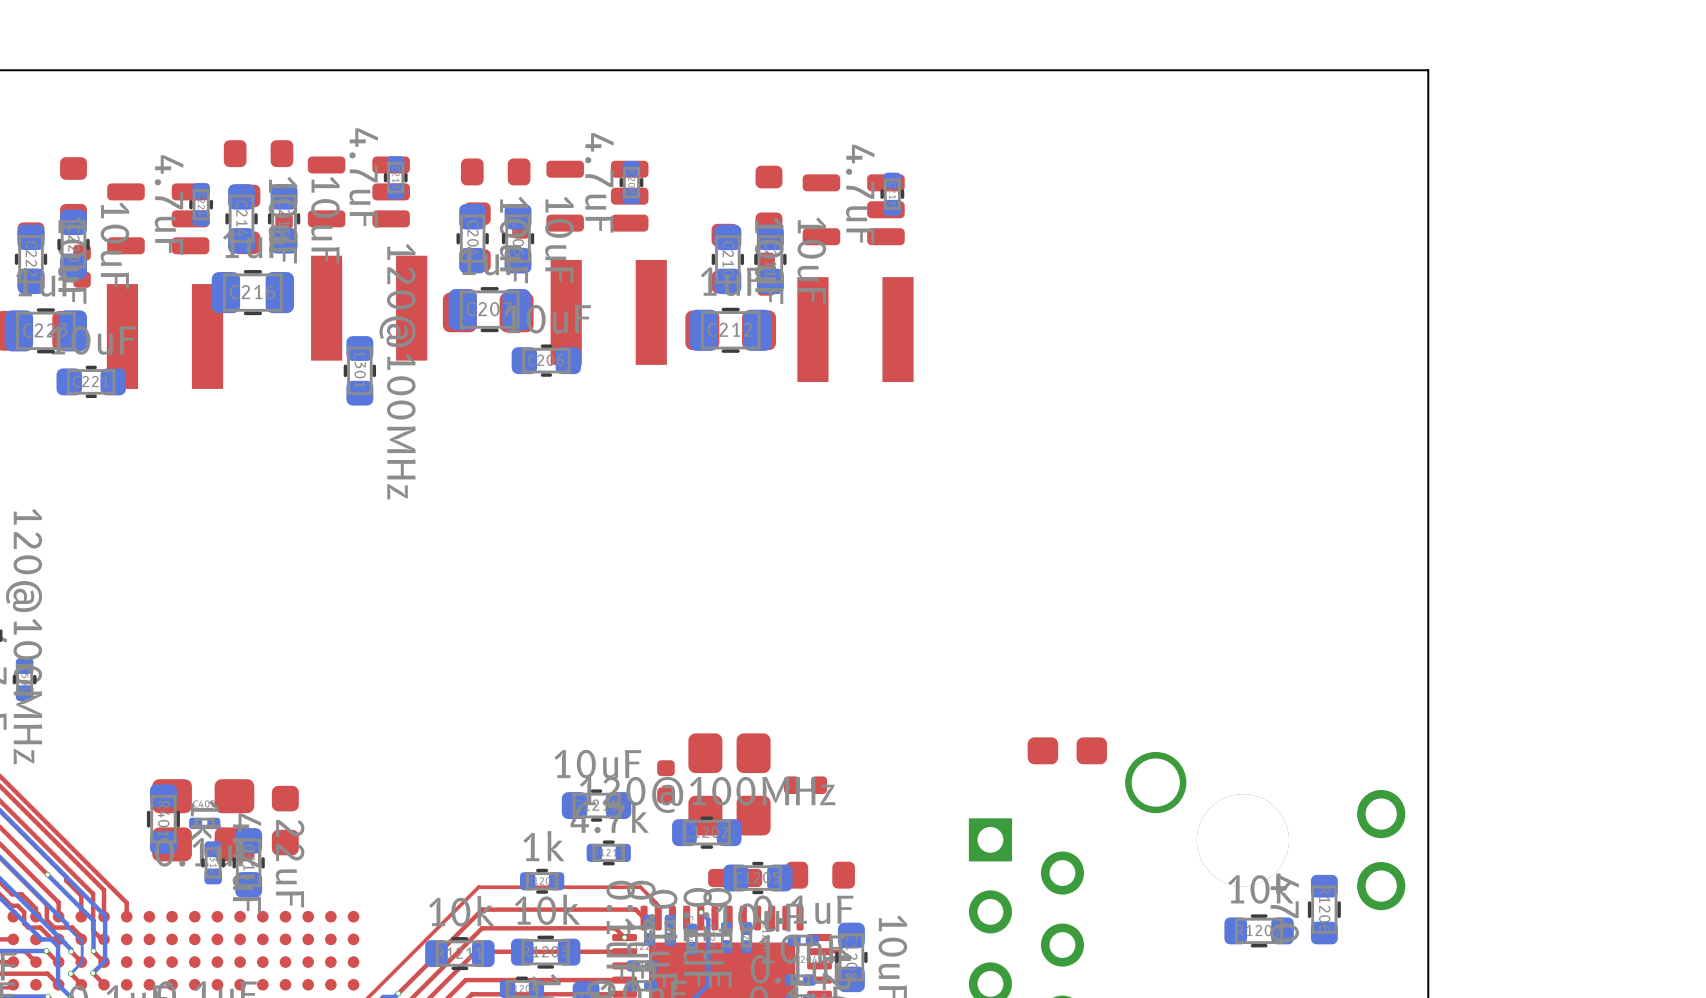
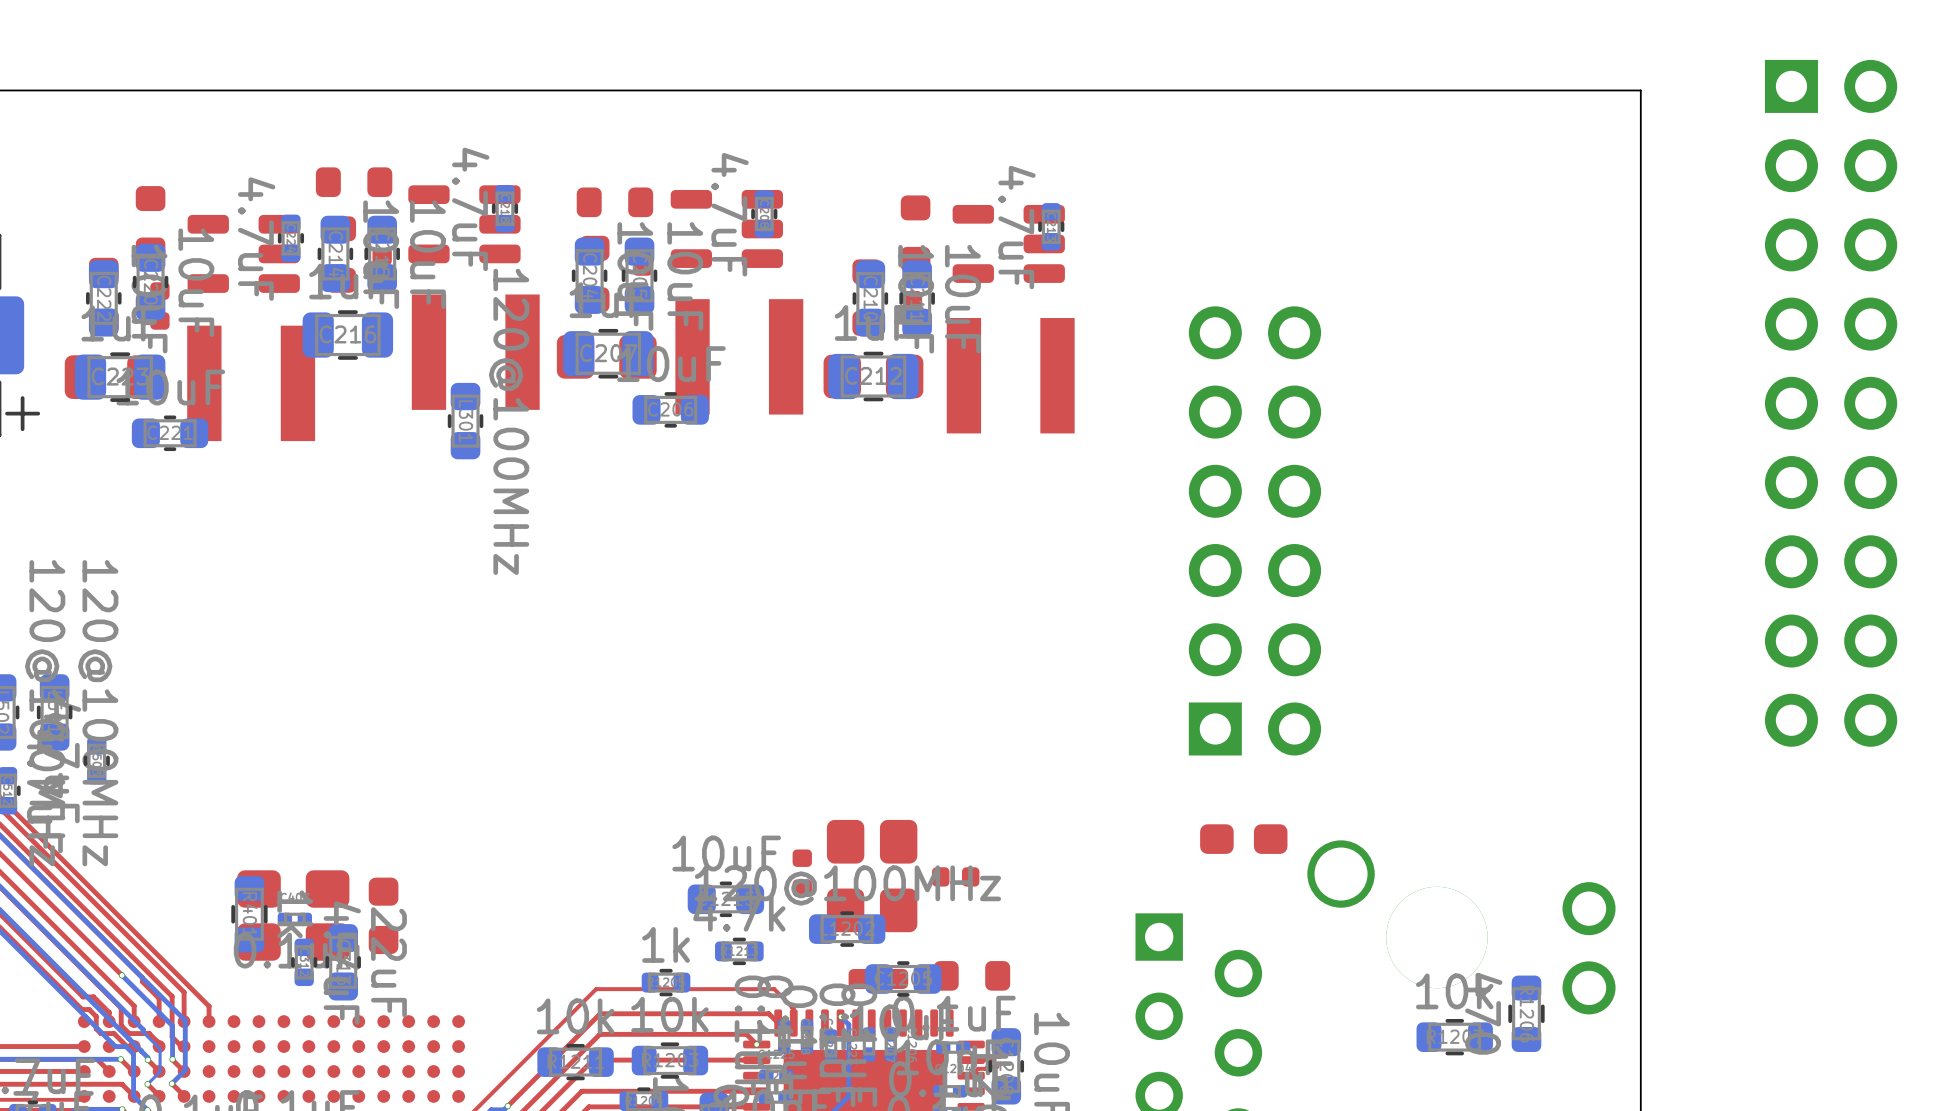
part: none -> (1831, 403)
part: none -> (1254, 530)

